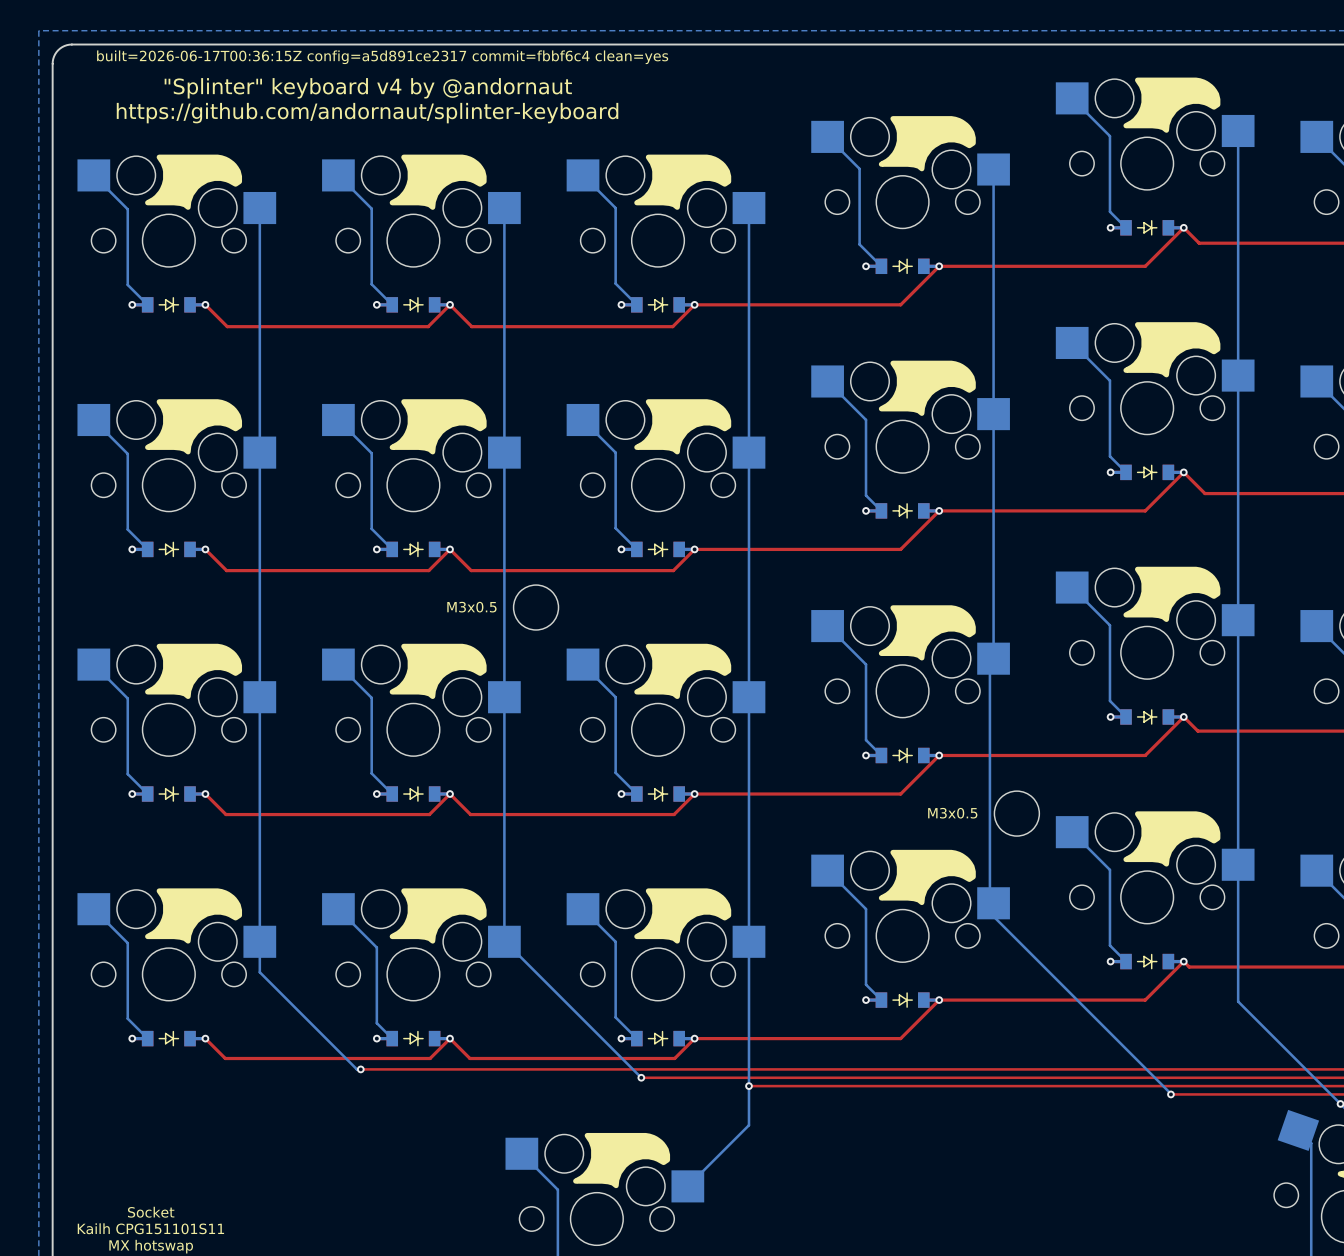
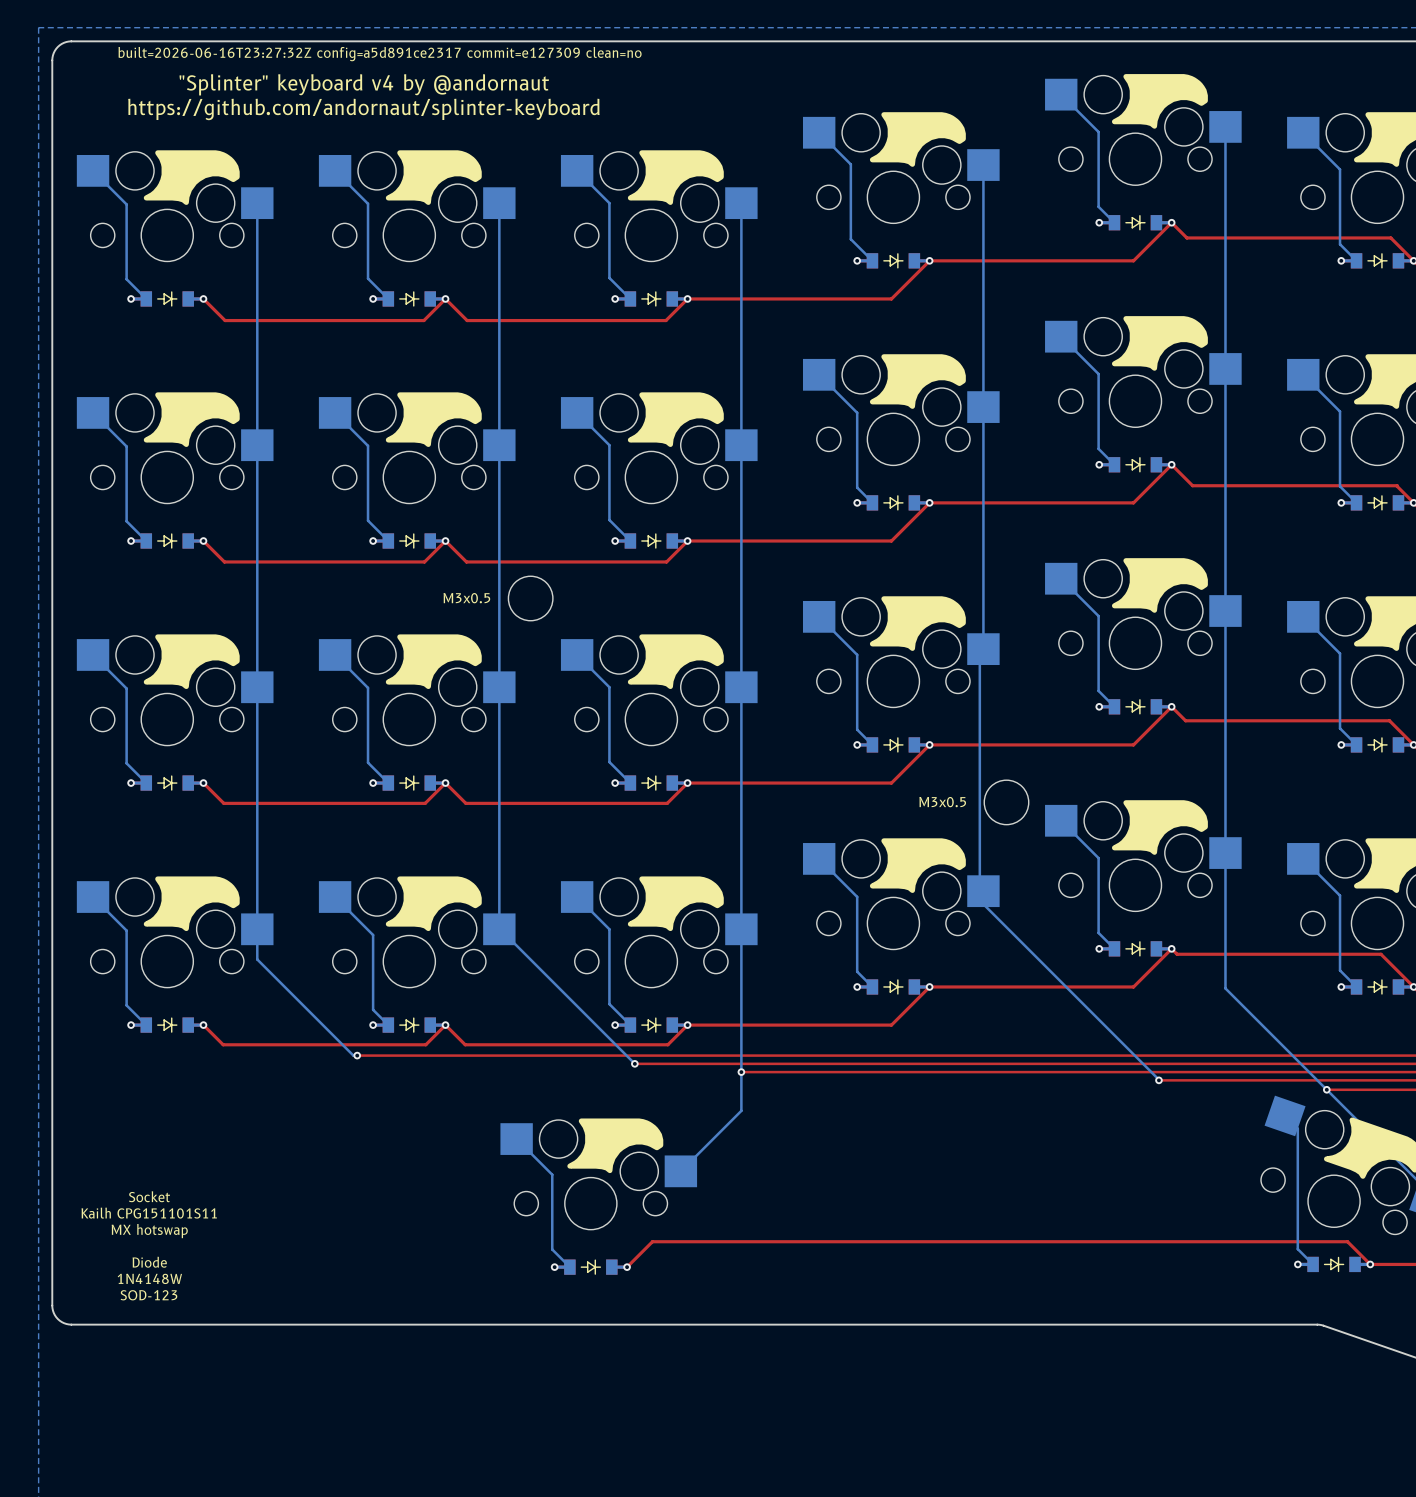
text: built=2026-06-17T00:36:15Z config=a5d891ce2317 commit=fbbf6c4 clean=yes (382, 57) -> built=2026-06-16T23:27:32Z config=a5d891ce2317 commit=e127309 clean=no (380, 54)

